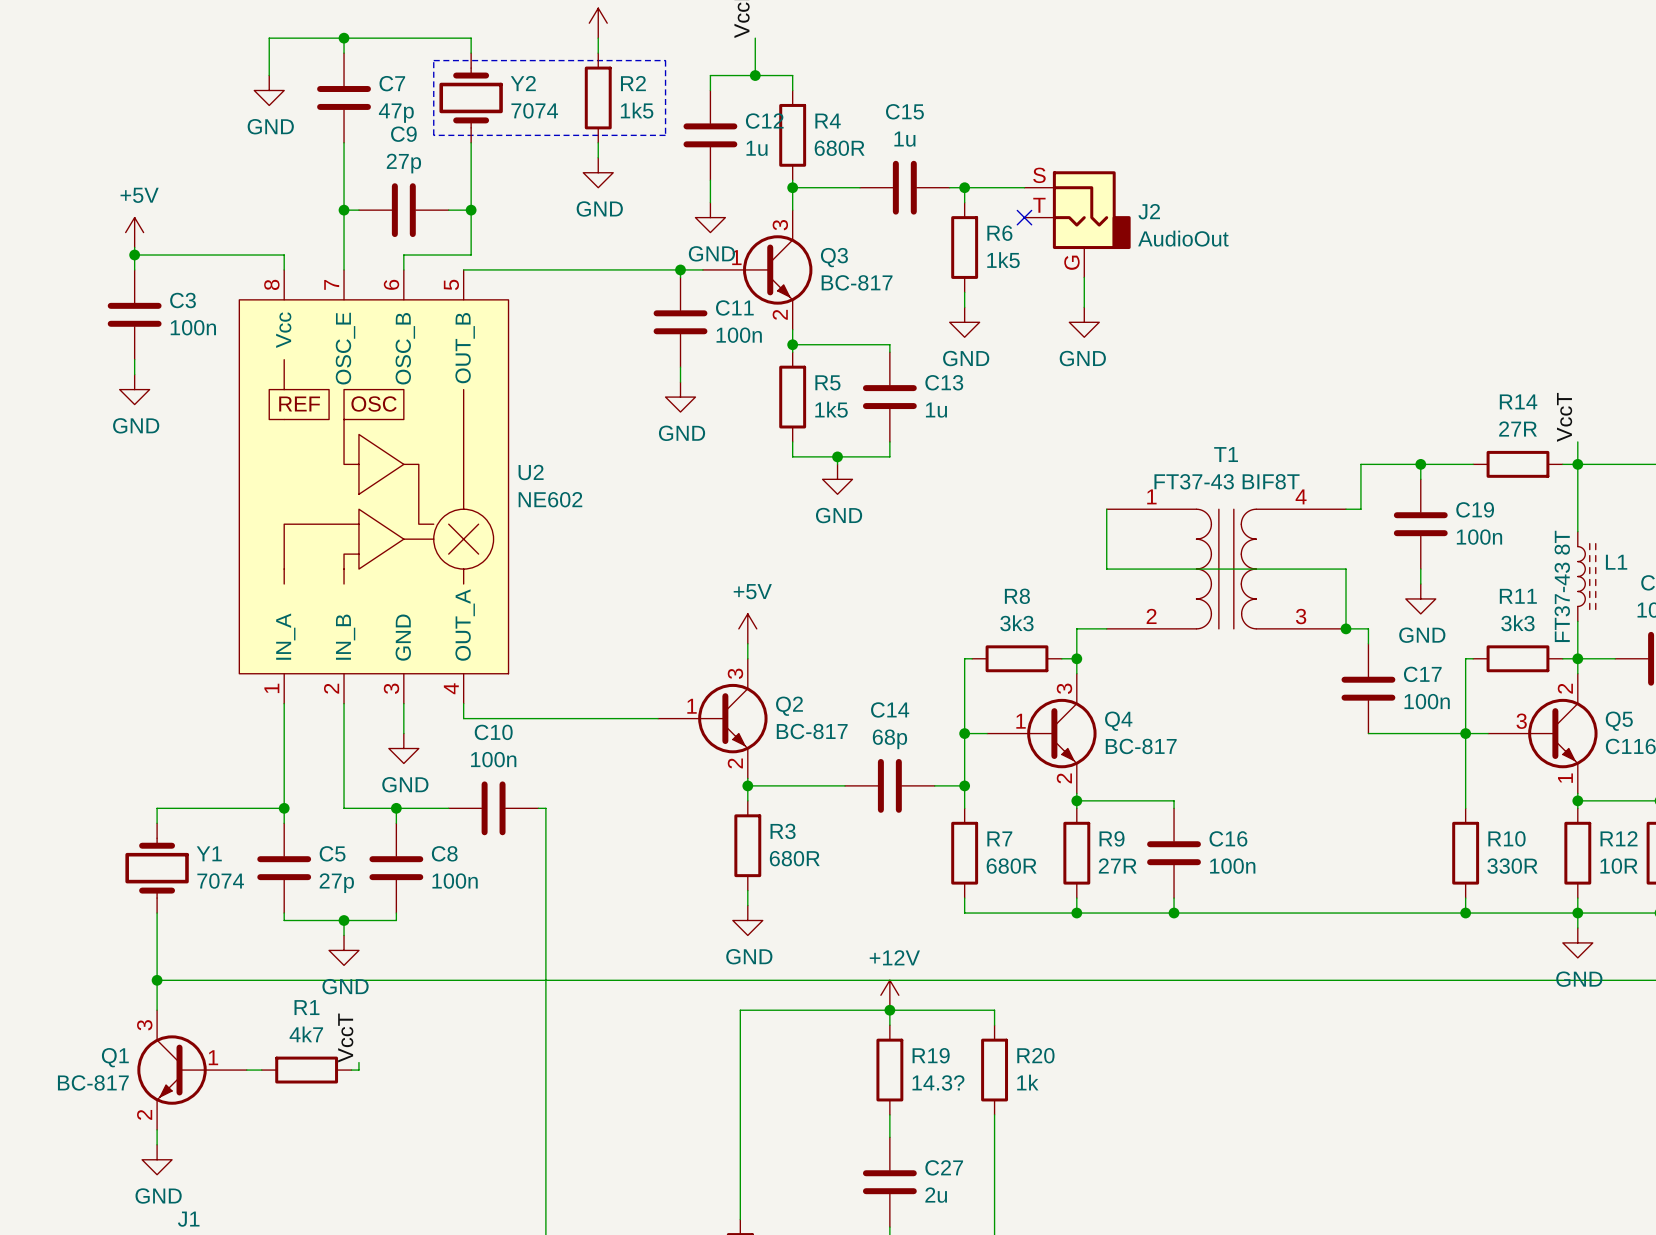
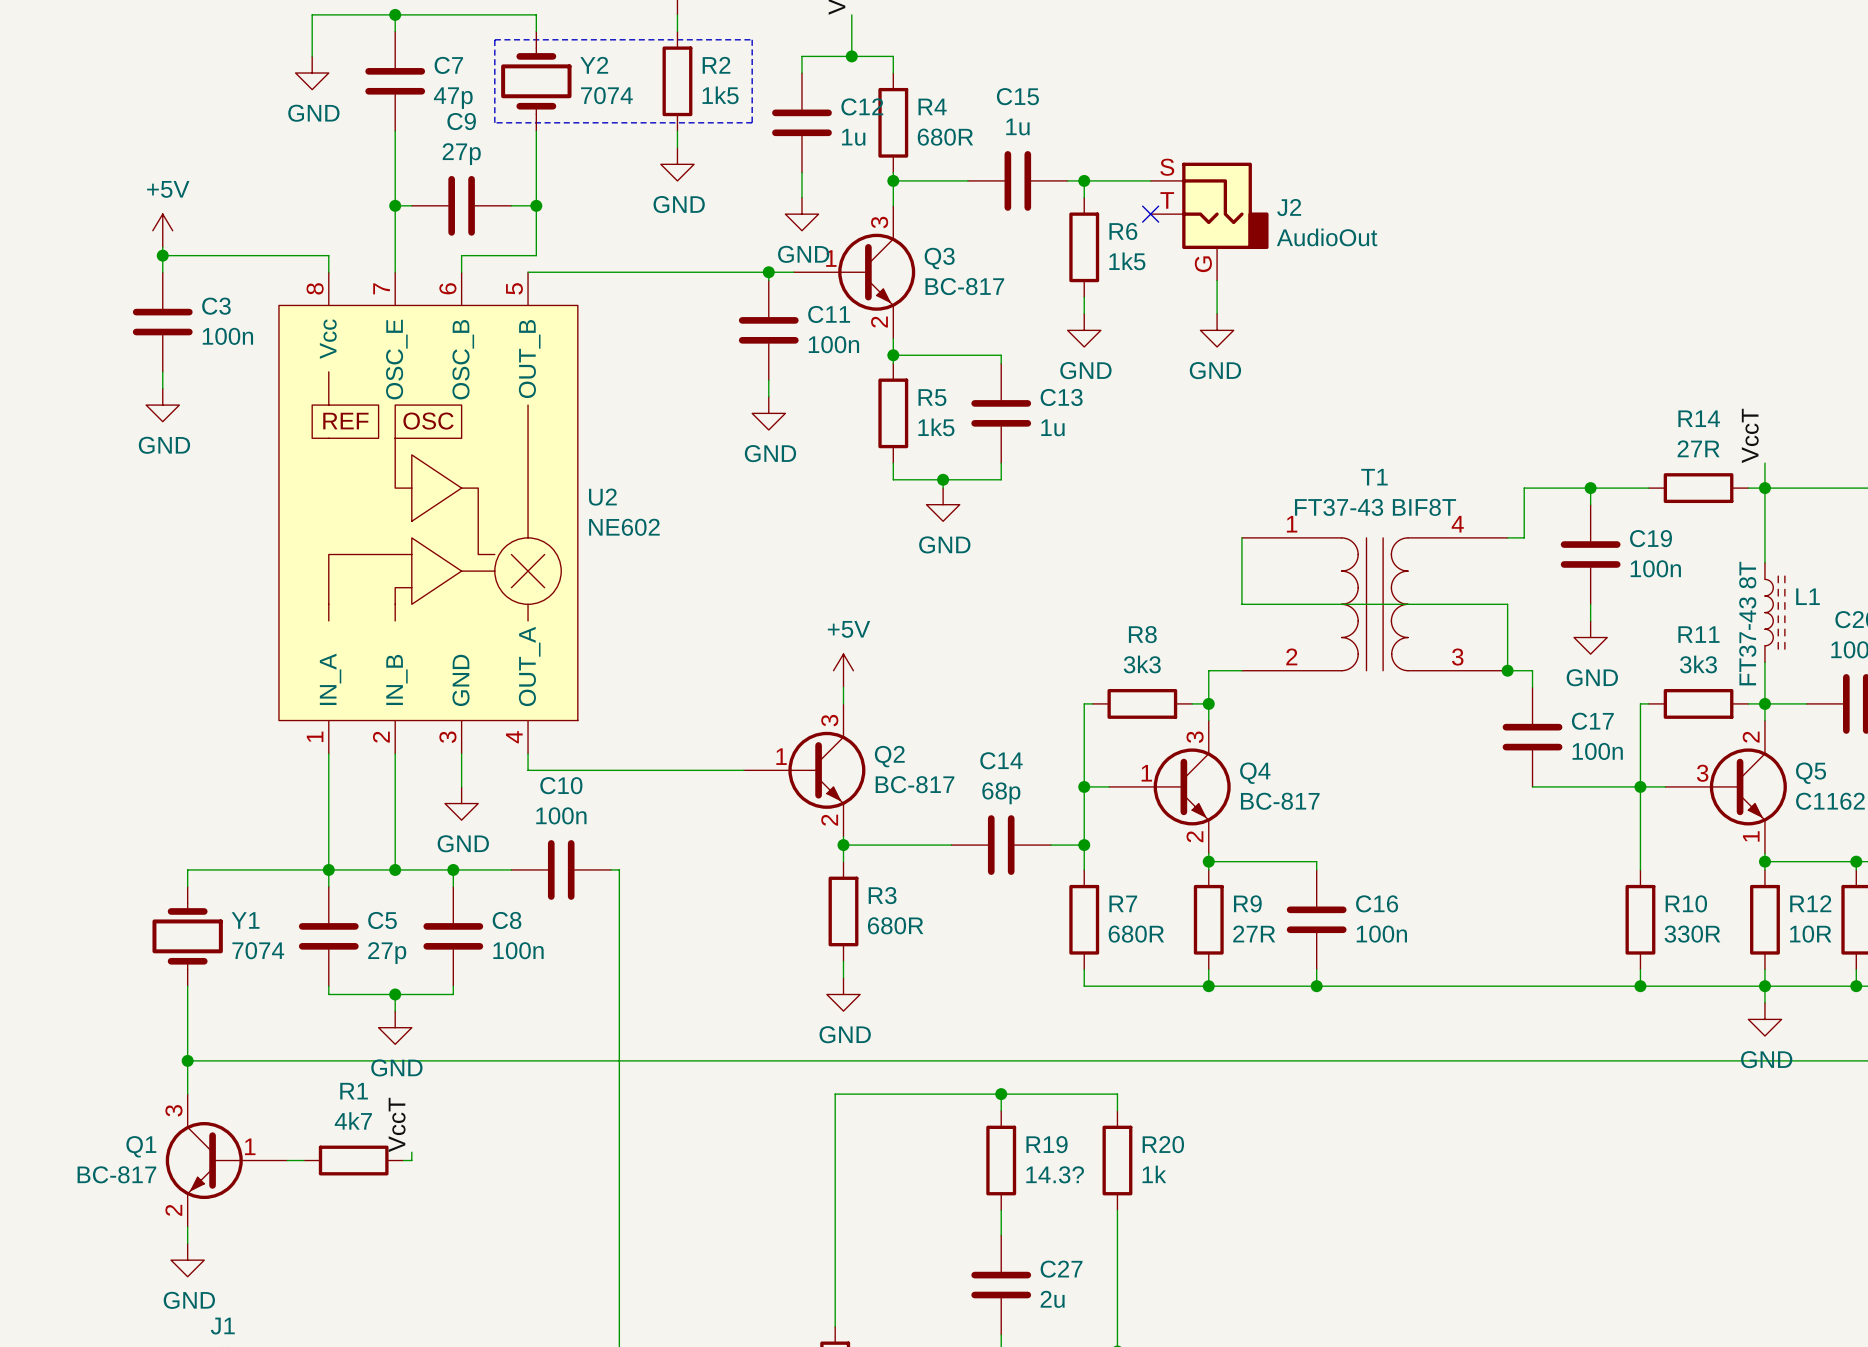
wire: none -> (328, 869) (395, 869)
junction: none -> (395, 869)
power symbol: +12V (889, 995) -> none

